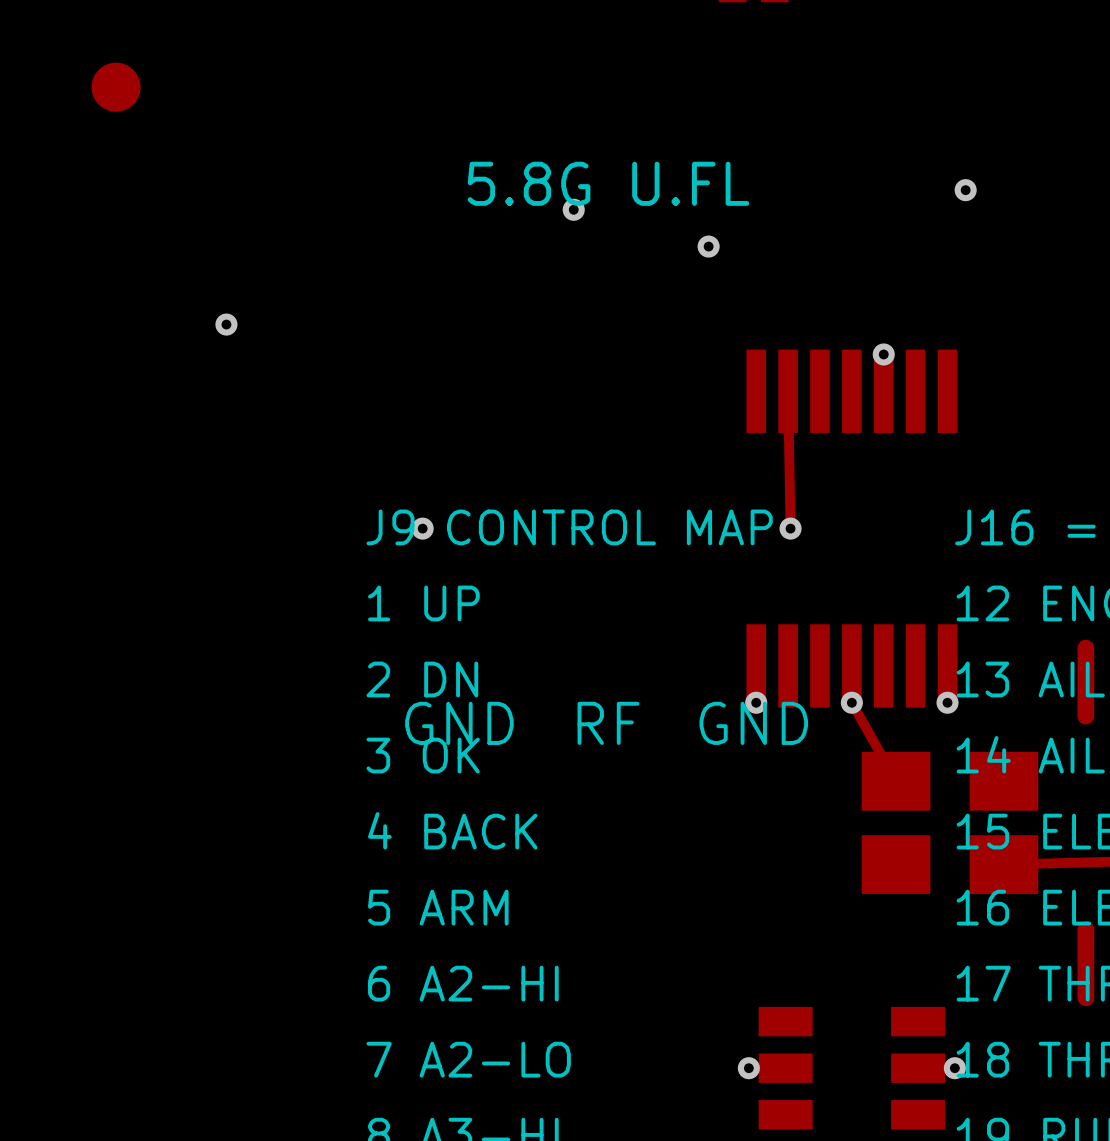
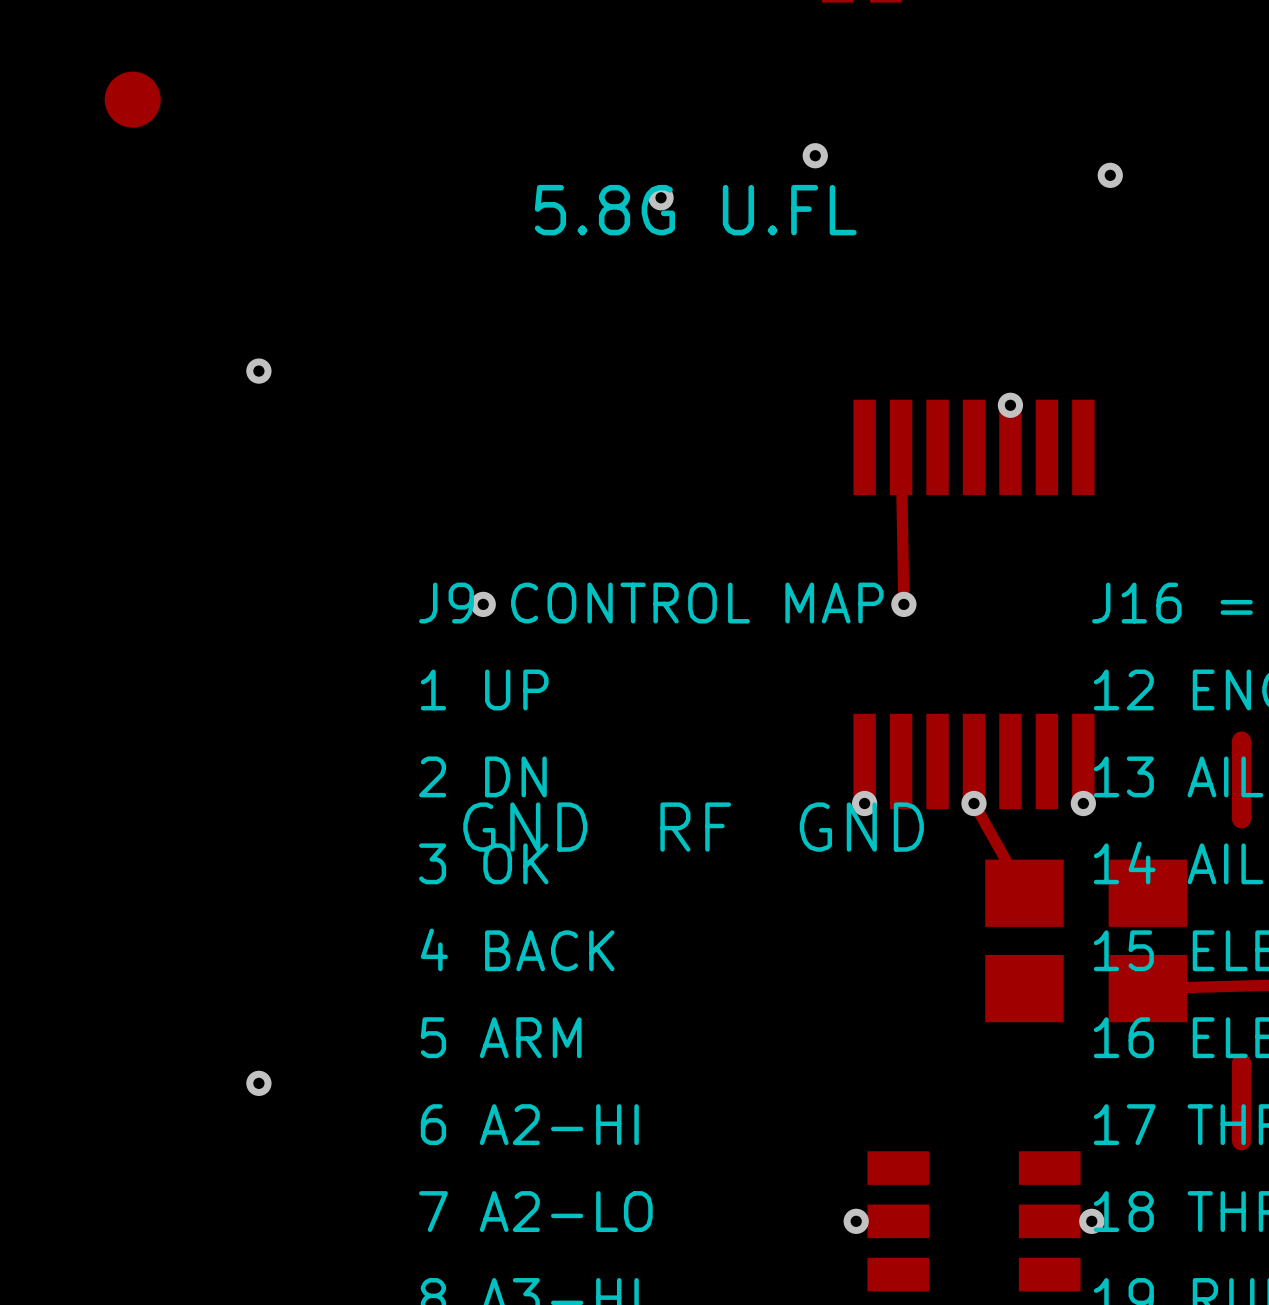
via: none -> (815, 155)
via position: (965, 190) -> (1110, 175)
via position: (573, 209) -> (661, 197)
via: (708, 246) -> none
via: none -> (258, 1083)

